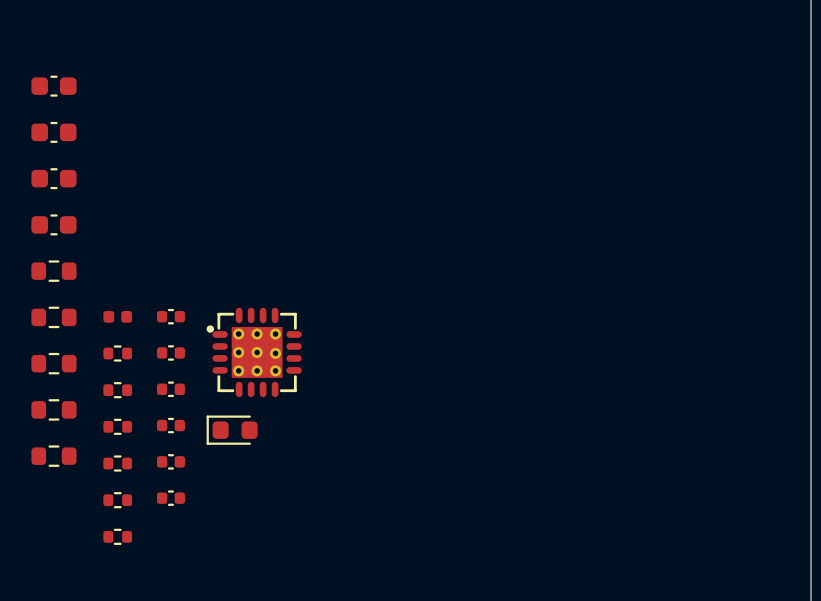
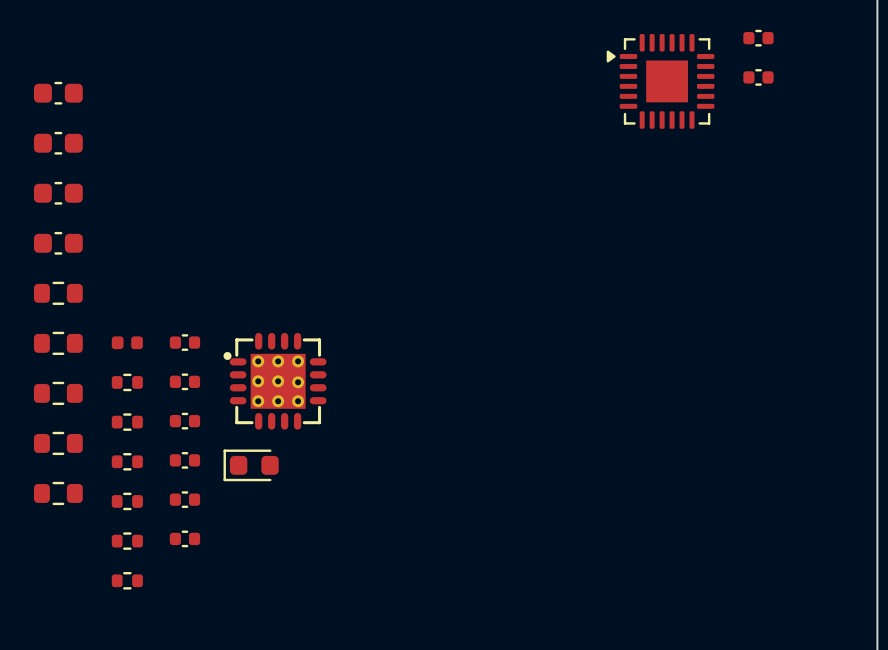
part: none -> (758, 38)
part: none -> (758, 77)
part: none -> (660, 81)

